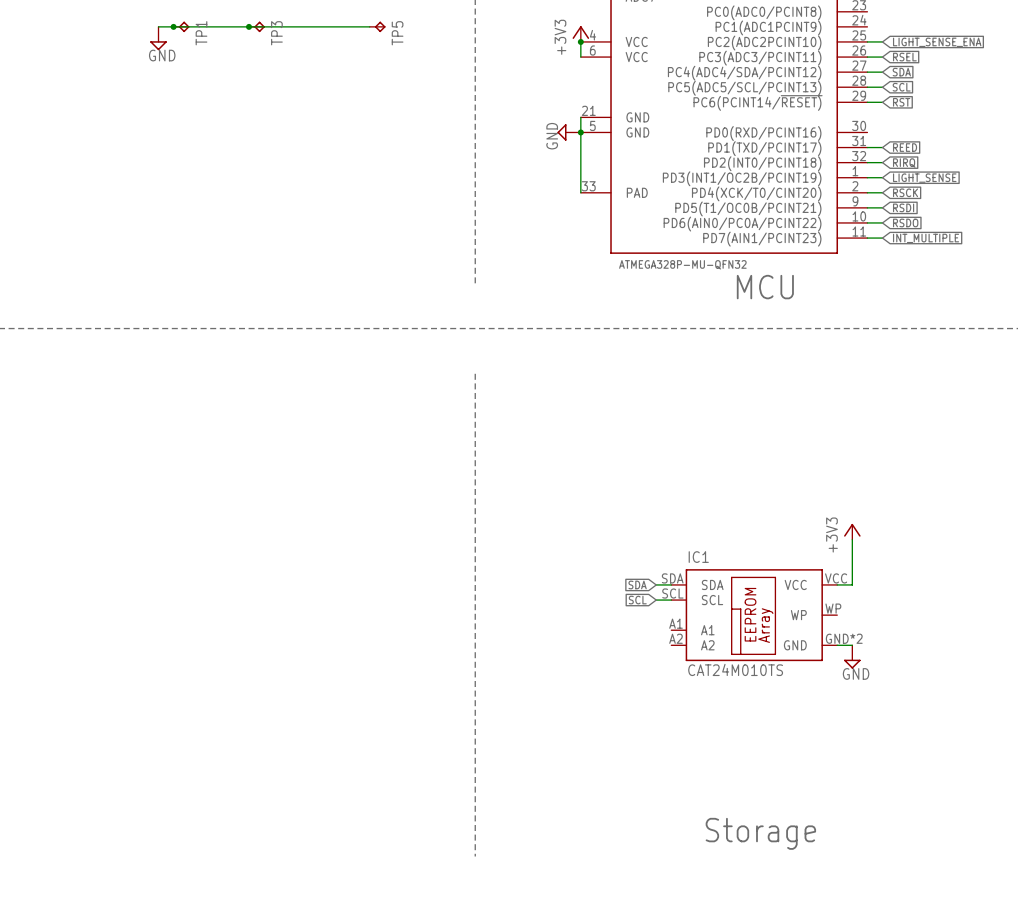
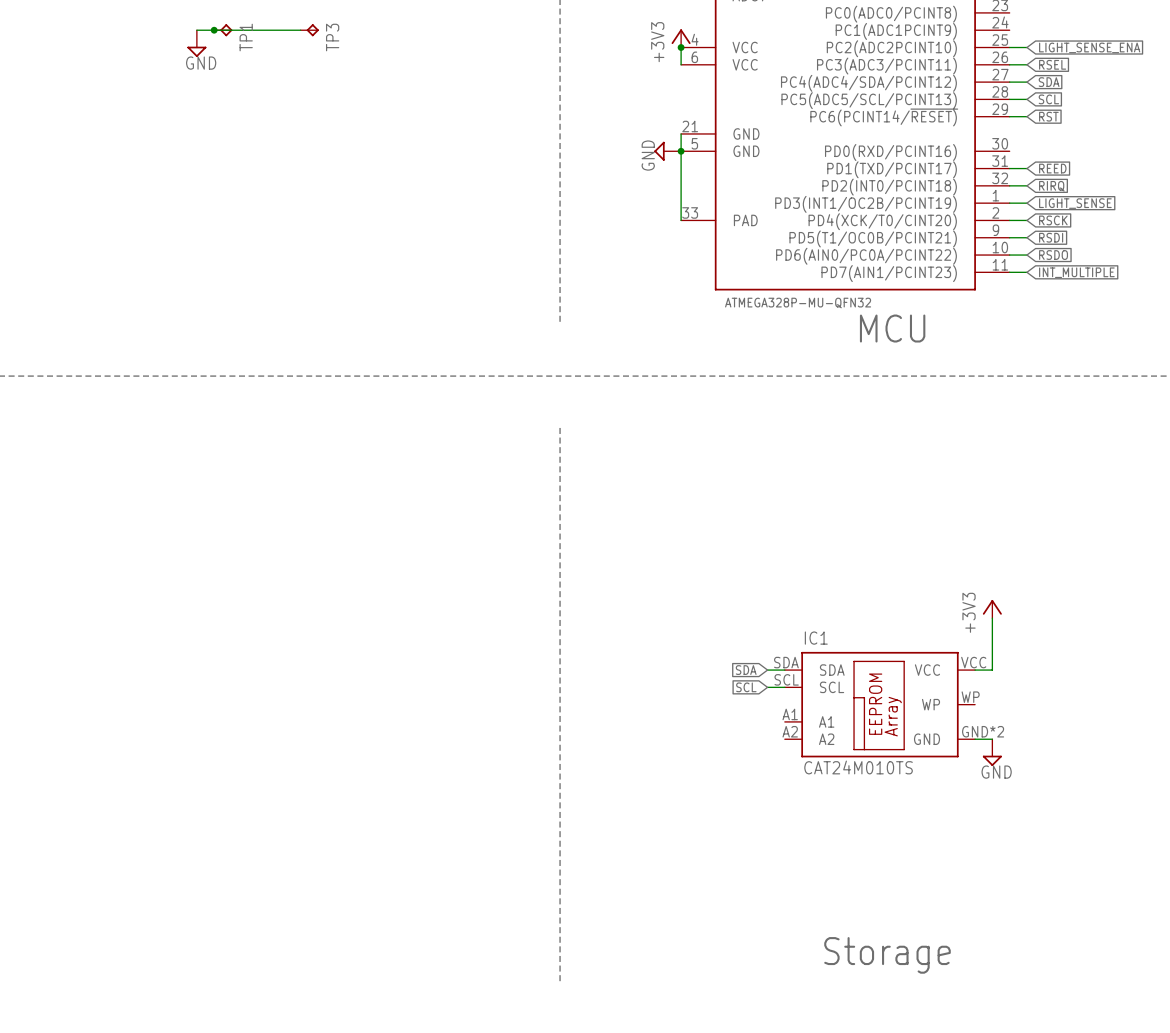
wire: (249, 26) (369, 26) -> none
junction: (249, 26) -> none
TP5: (377, 26) -> none

